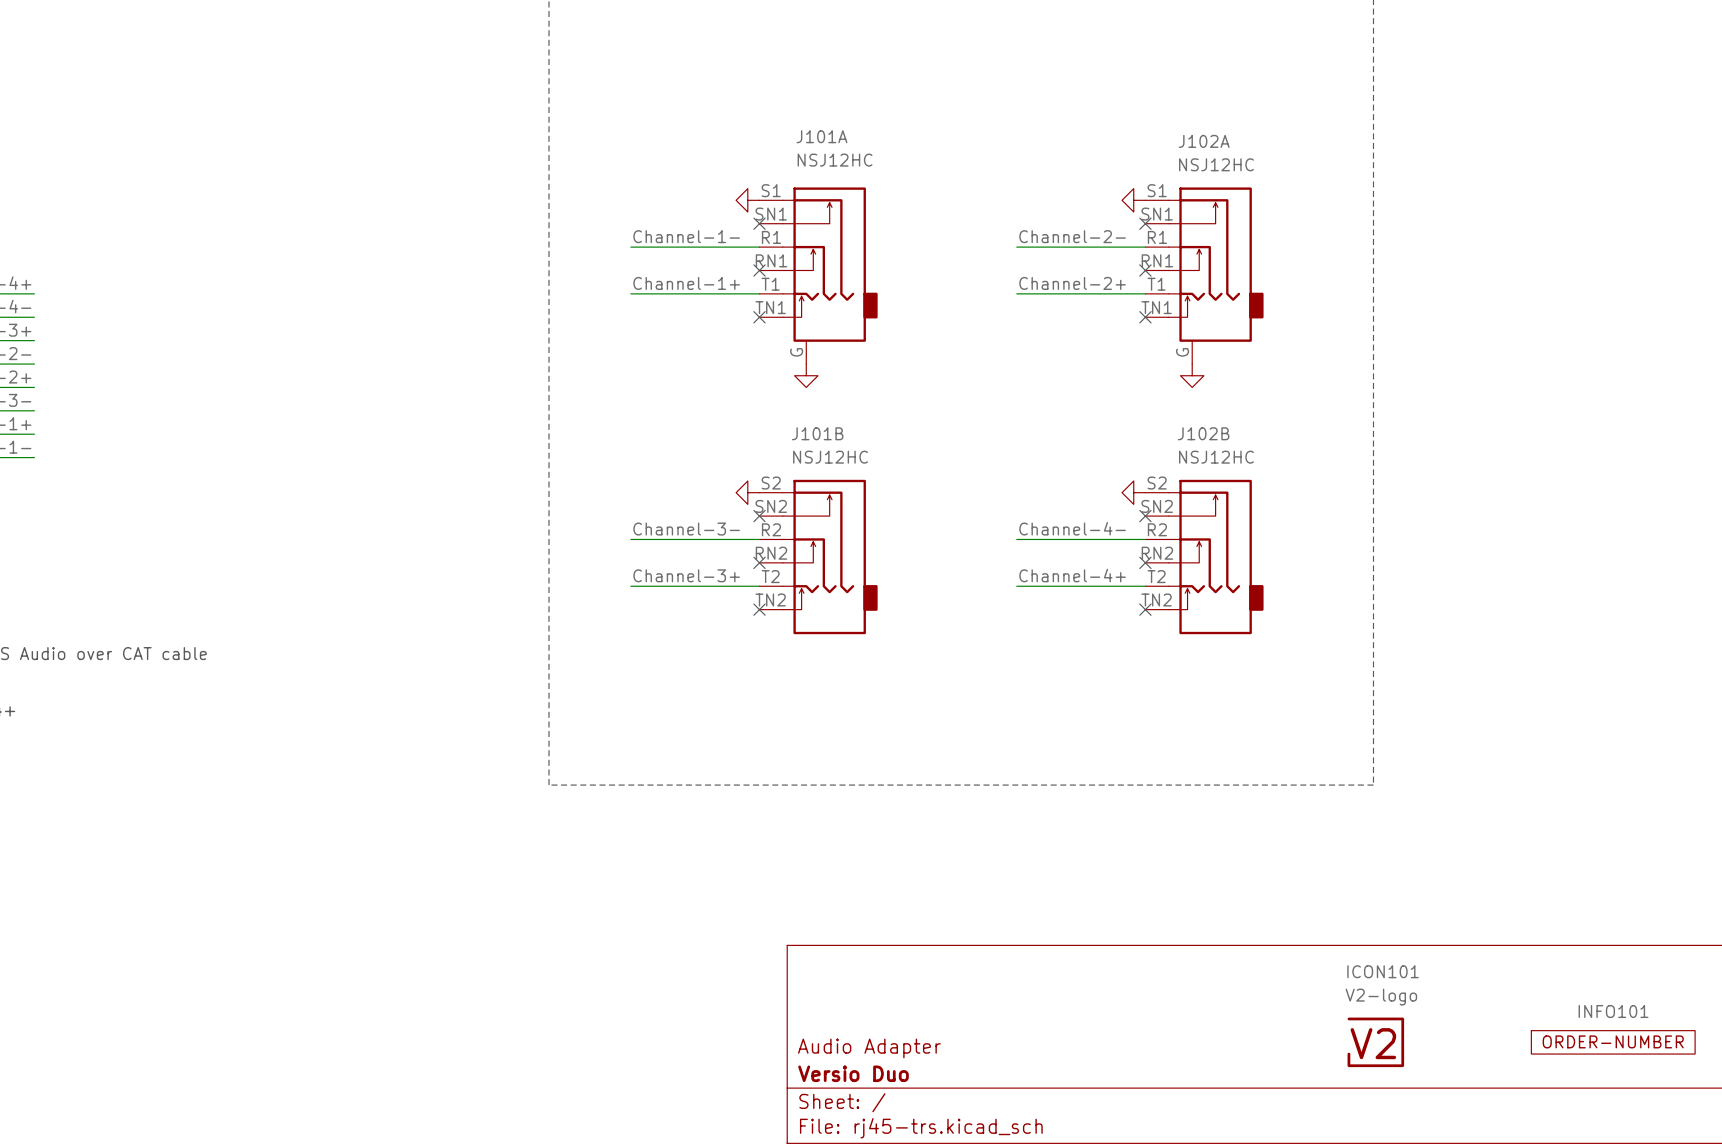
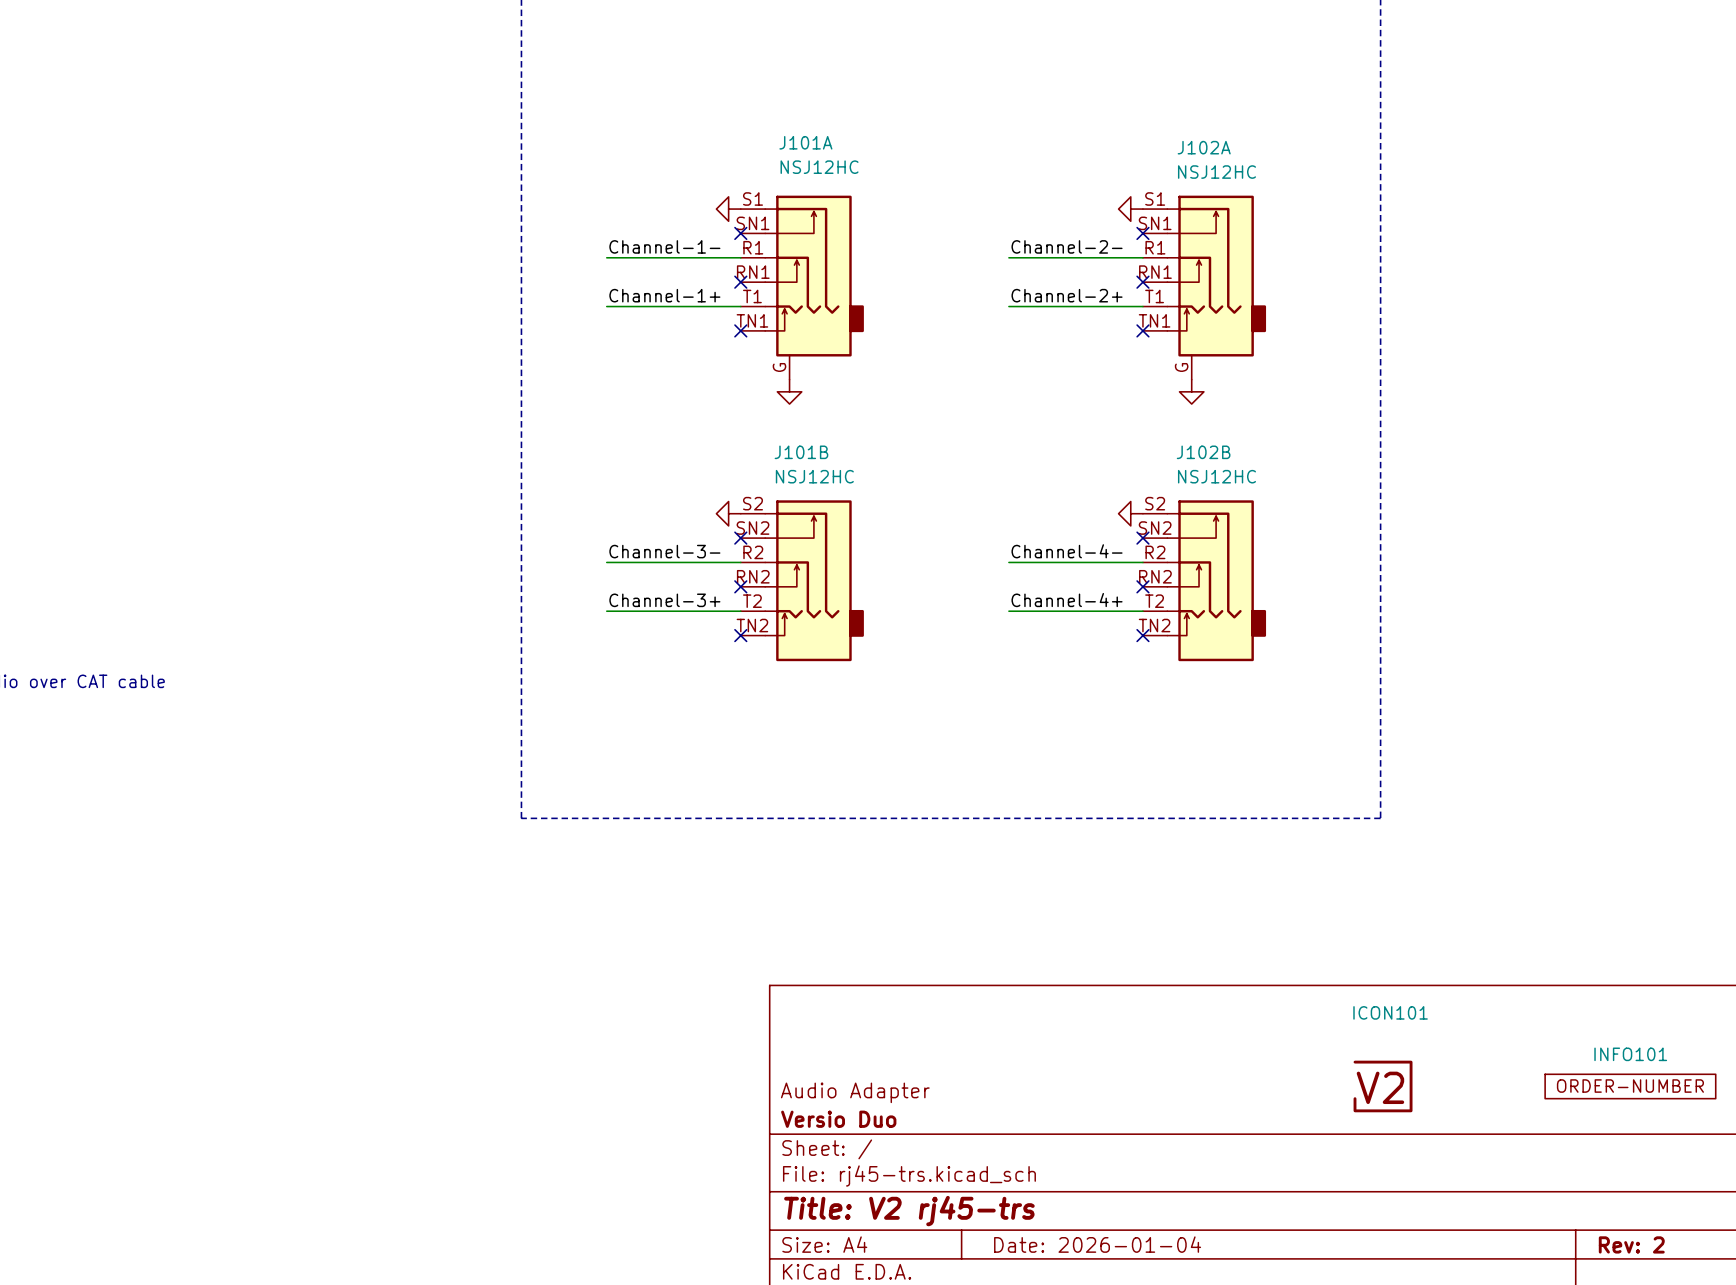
ICON101 value: V2-logo (1381, 997) -> none

